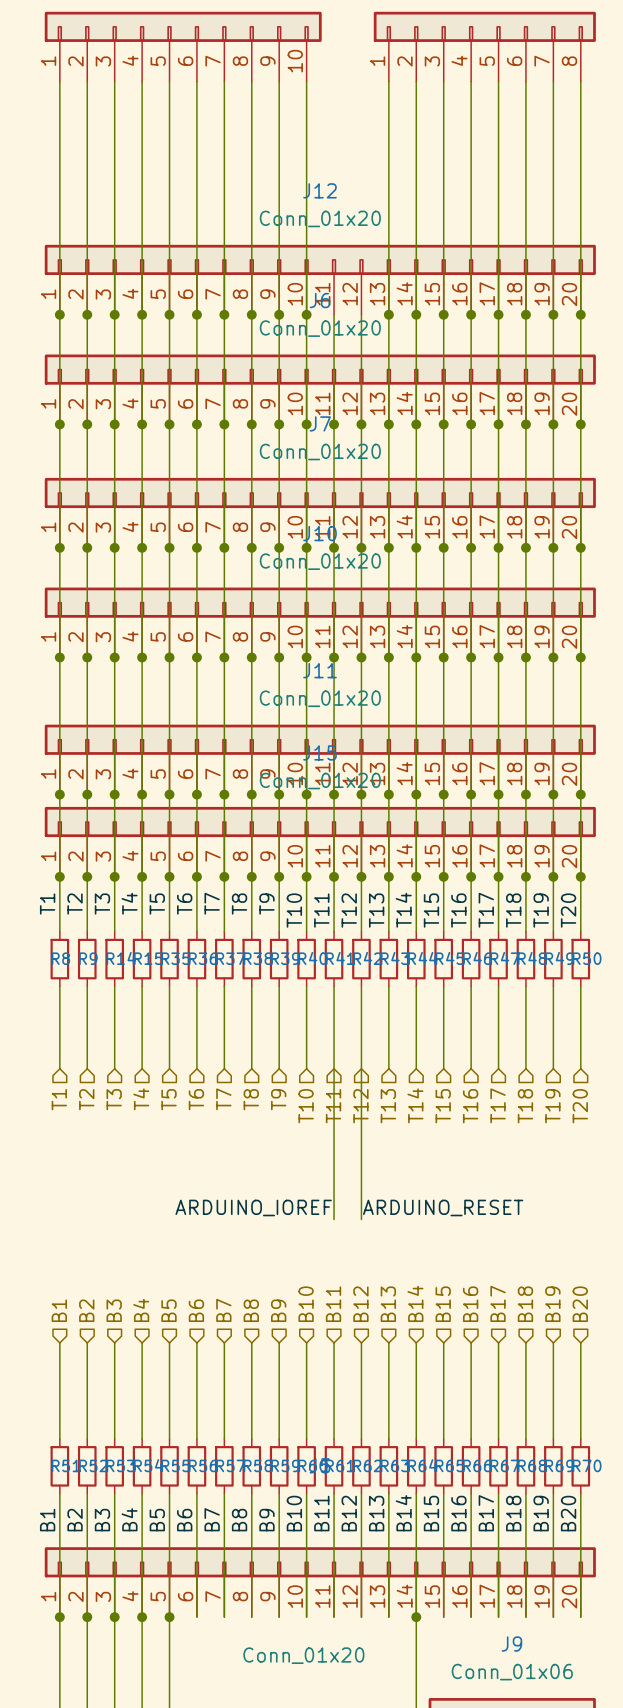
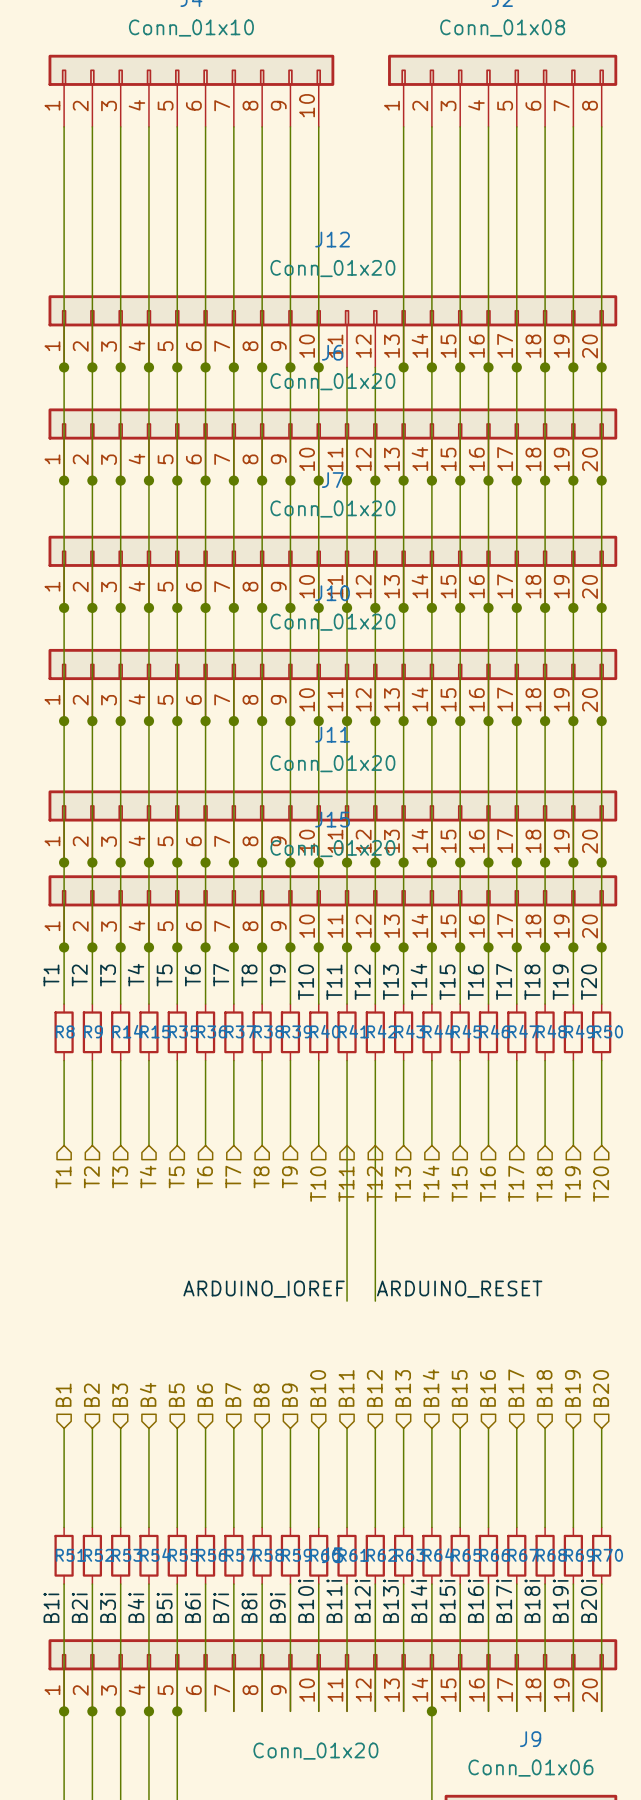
label: B10 (294, 1513) -> B10i (306, 1601)
label: B11 (321, 1513) -> B11i (334, 1601)
label: B12 (349, 1513) -> B12i (362, 1601)
label: B13 (376, 1513) -> B13i (390, 1601)
label: B14 (403, 1513) -> B14i (418, 1601)
label: B15 (431, 1513) -> B15i (447, 1601)
label: B16 (458, 1513) -> B16i (475, 1601)
label: B17 (486, 1513) -> B17i (504, 1601)
label: B18 (513, 1513) -> B18i (532, 1601)
label: B19 (541, 1513) -> B19i (560, 1601)
label: B20 (568, 1513) -> B20i (589, 1601)
label: B4 (129, 1519) -> B4i (136, 1607)
label: B7 (212, 1519) -> B7i (221, 1607)
label: B1 (47, 1520) -> B1i (51, 1607)
label: B2 (75, 1520) -> B2i (79, 1607)
label: B3 (102, 1520) -> B3i (108, 1607)
label: B5 (157, 1520) -> B5i (164, 1607)
label: B6 (184, 1520) -> B6i (192, 1607)
label: B8 (239, 1520) -> B8i (249, 1607)
label: B9 (266, 1520) -> B9i (277, 1607)

